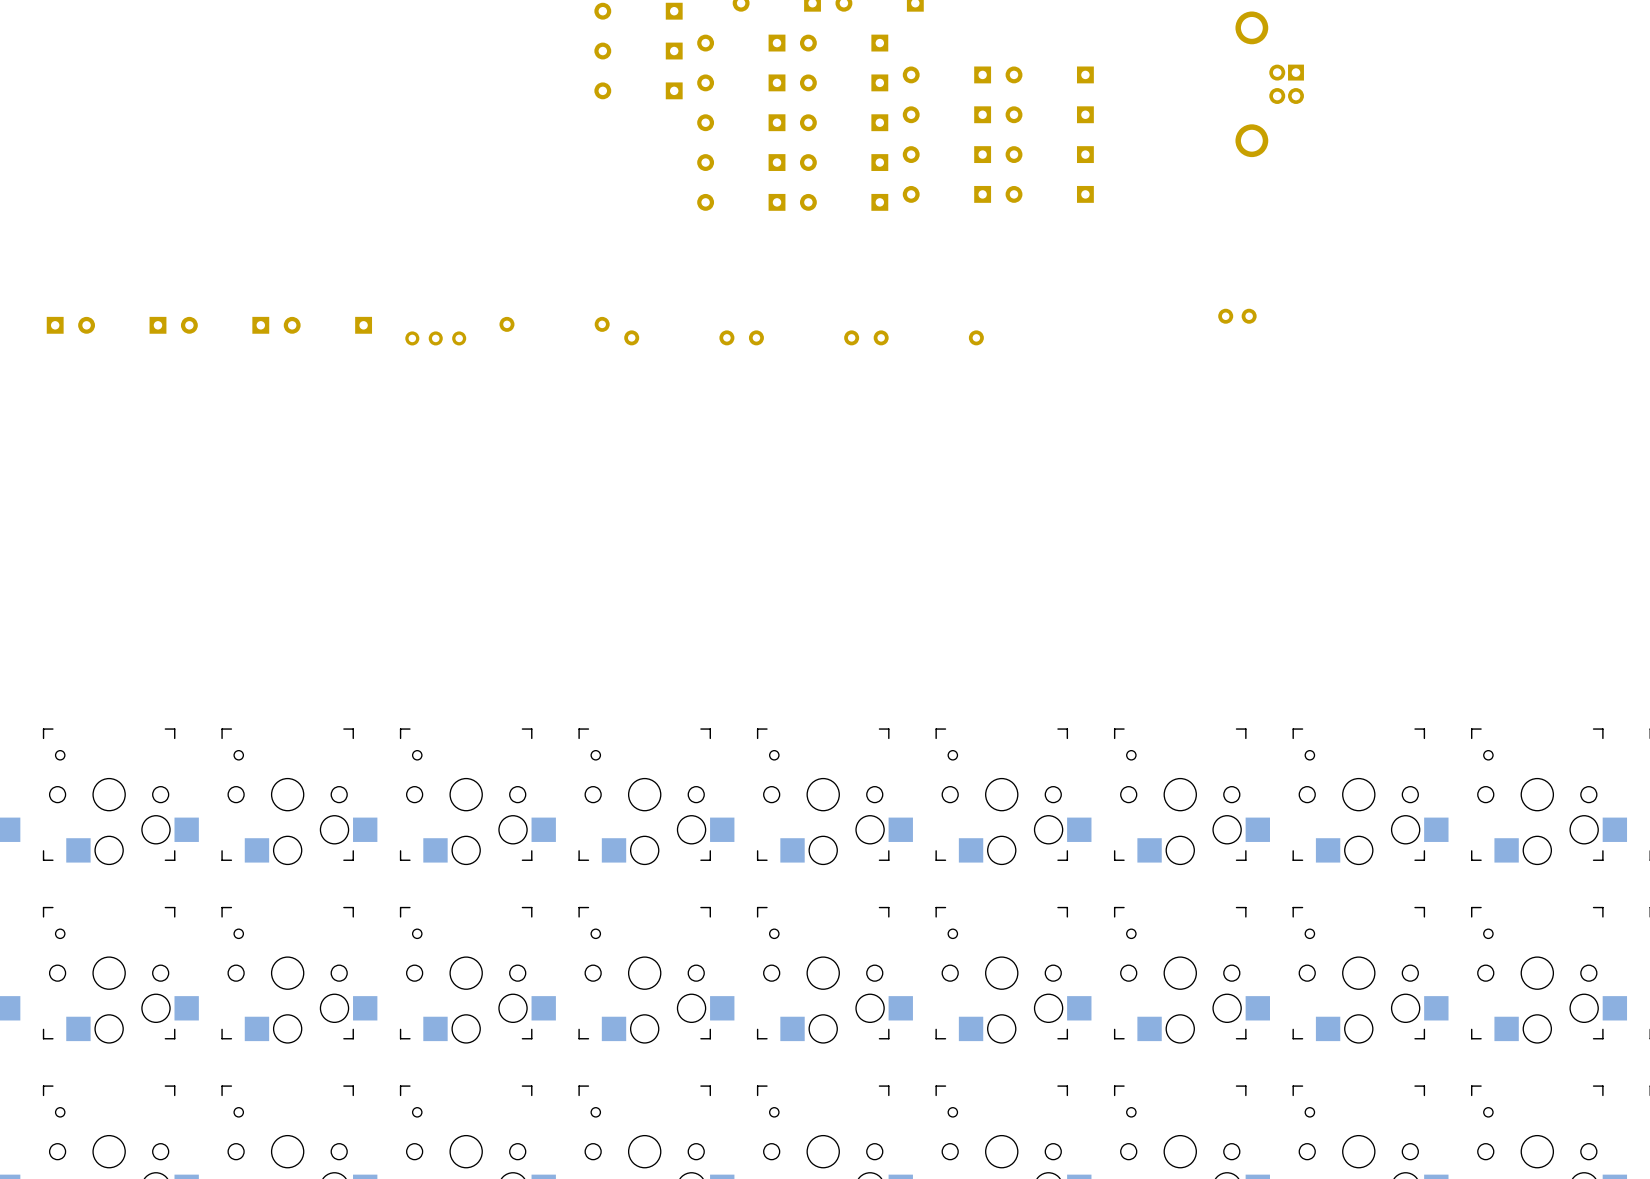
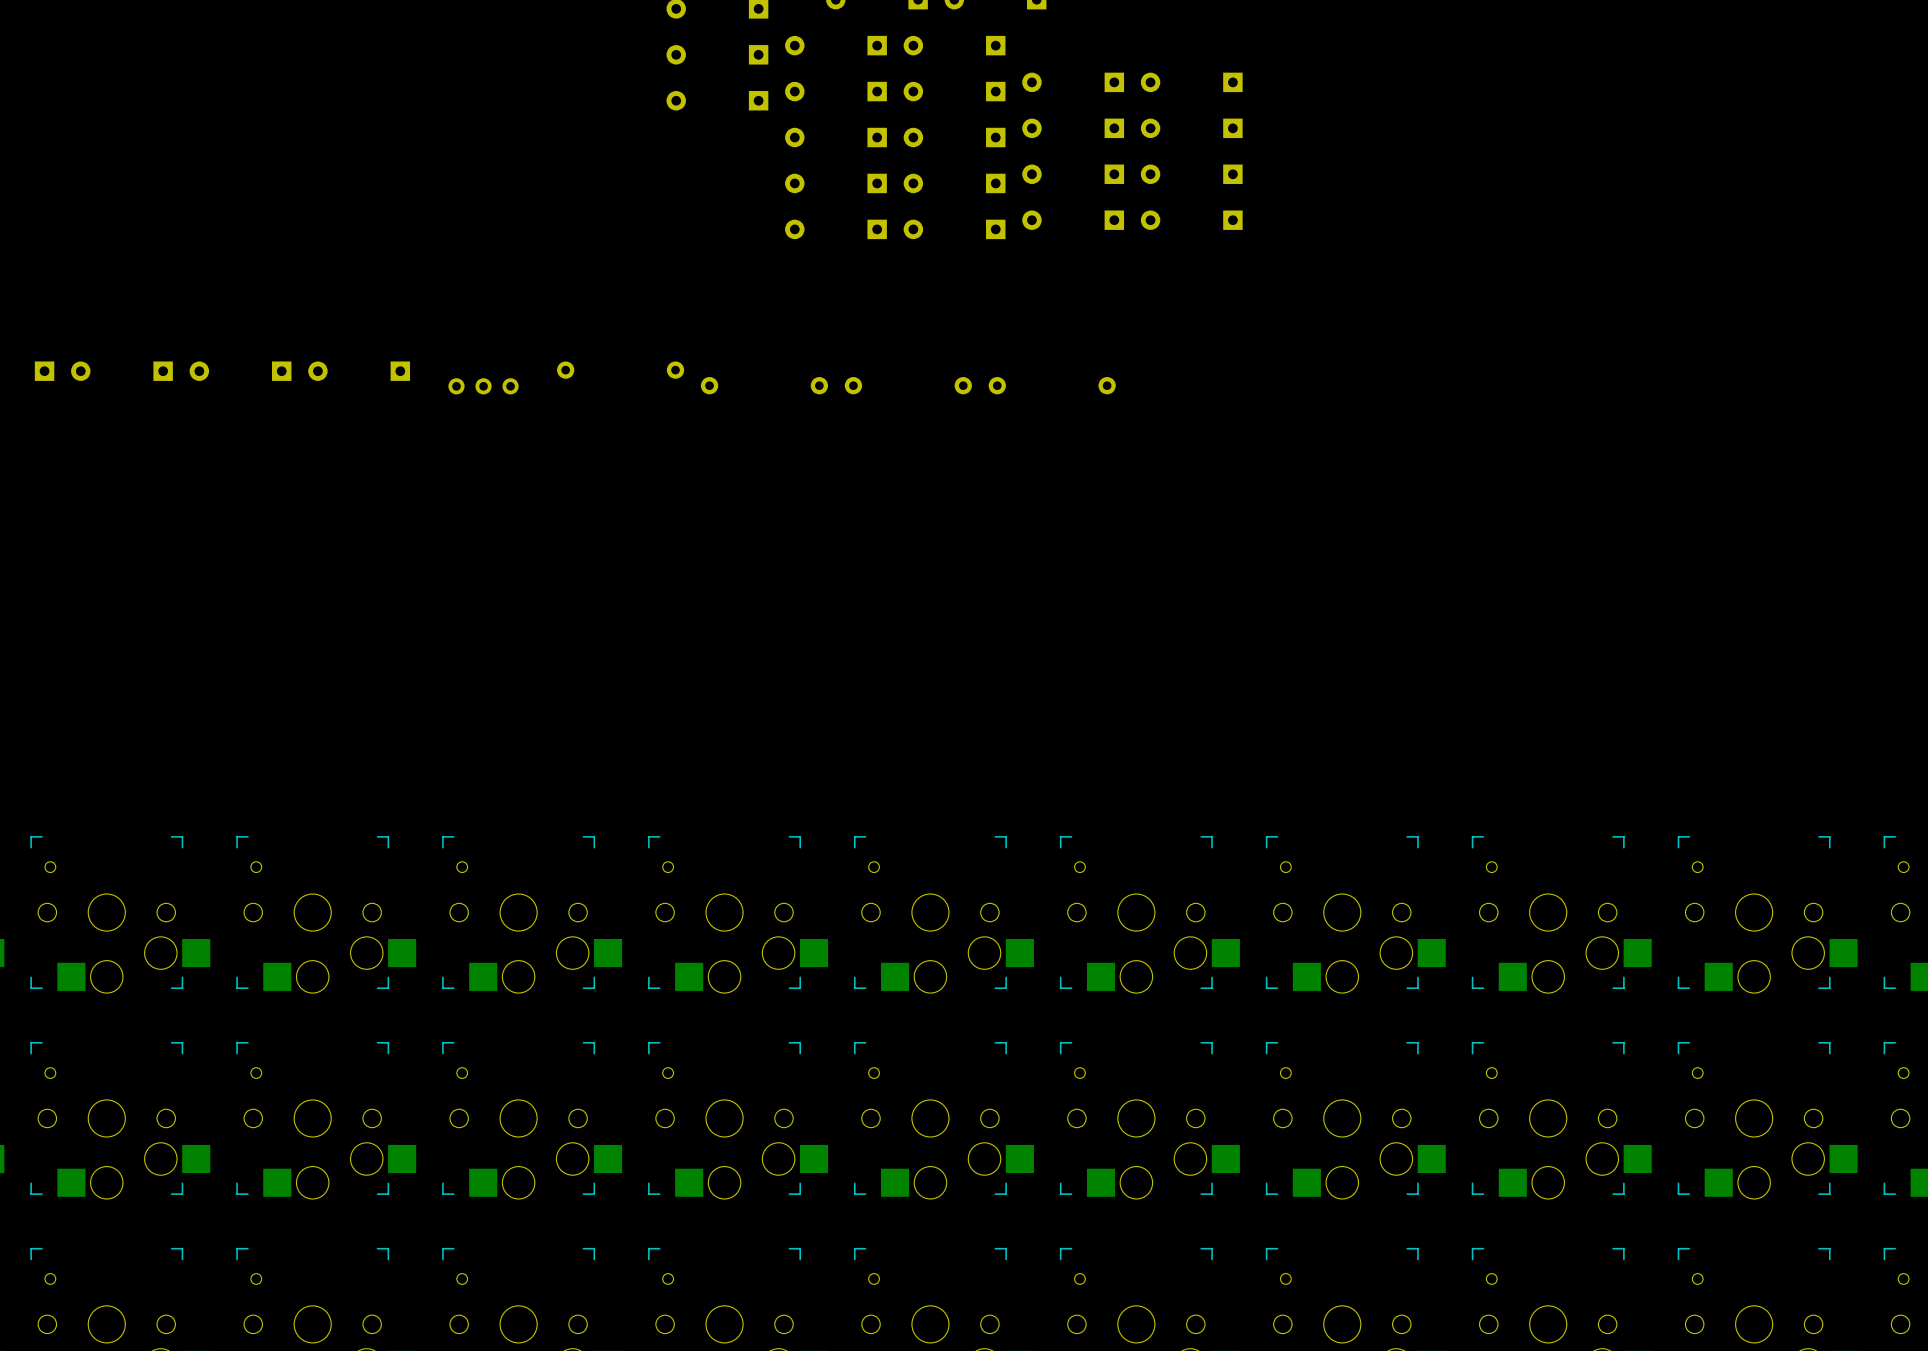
part: (1269, 84) -> none
part: (1237, 316) -> none

